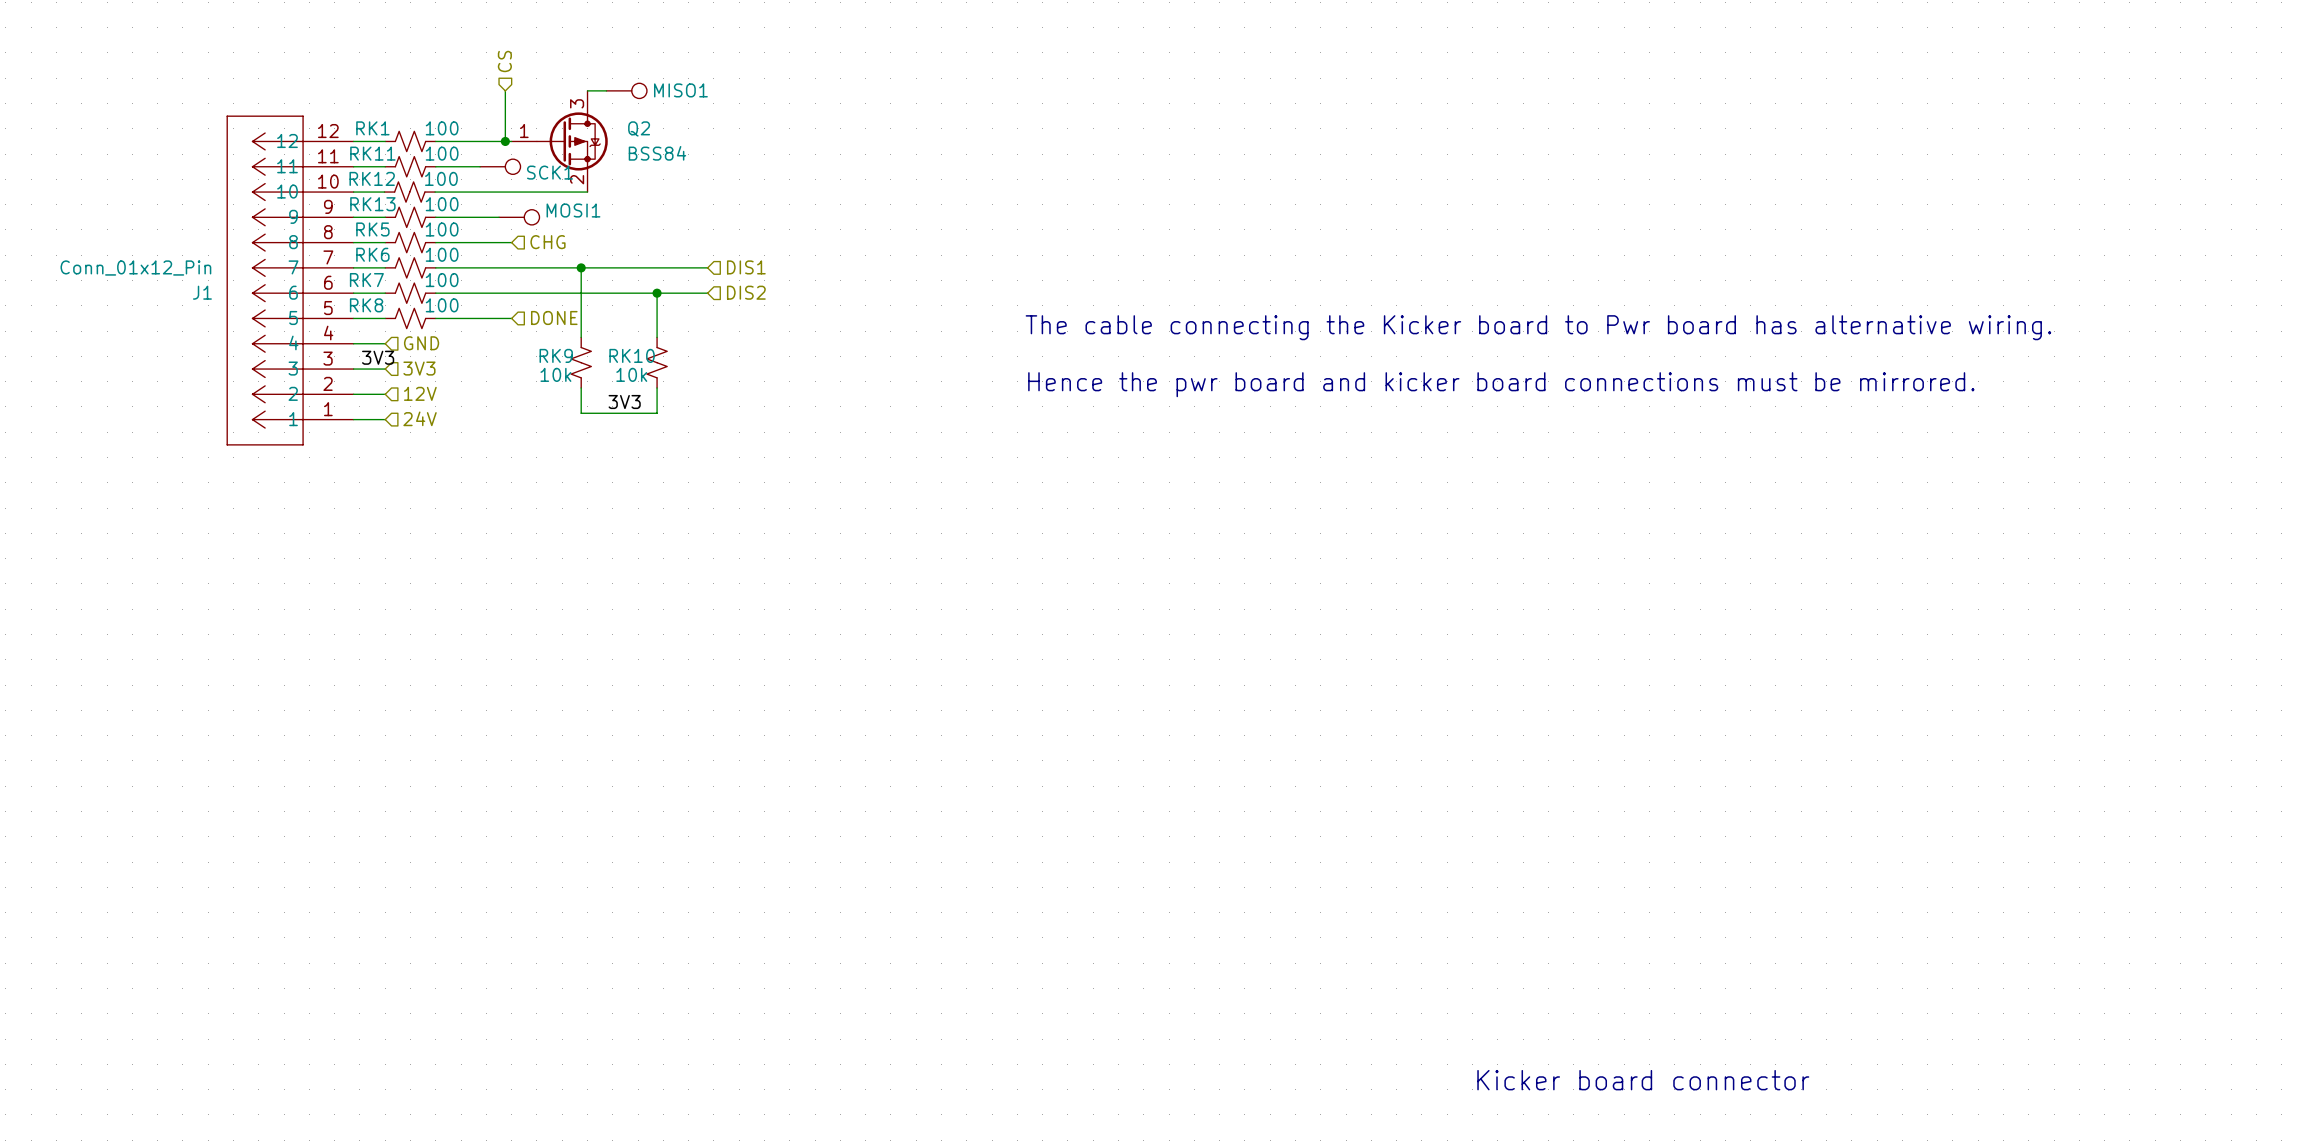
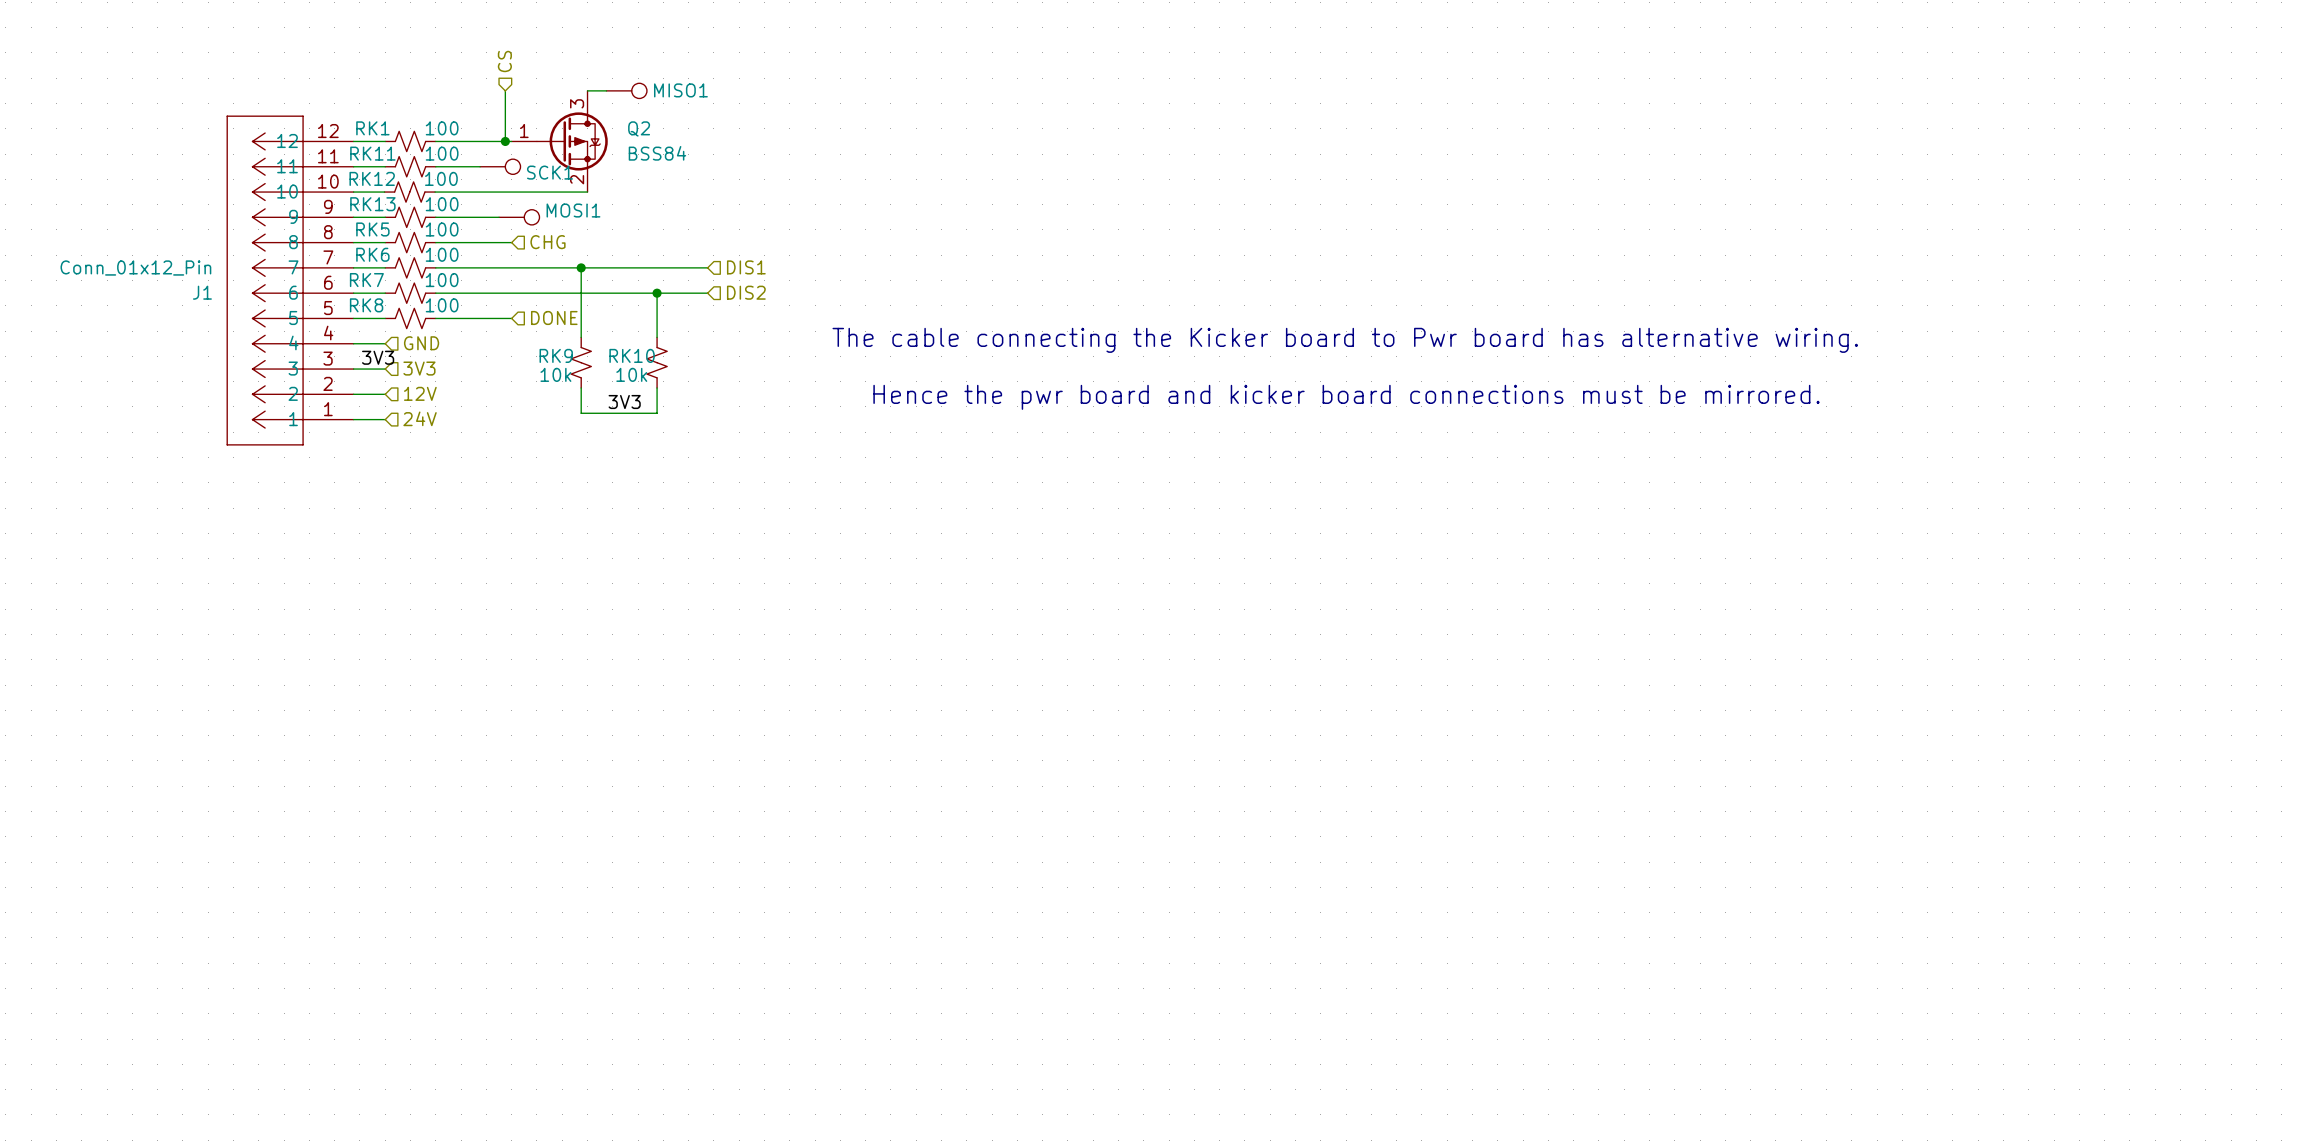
text: The cable connecting the Kicker board to Pwr board has alternative wiring. (1538, 327) -> none
text: none -> The cable connecting the Kicker board to Pwr board has alternative wiring. (1345, 340)
text: Hence the pwr board and kicker board connections must be mirrored. (1501, 384) -> none
text: none -> Hence the pwr board and kicker board connections must be mirrored. (1346, 397)
text: Kicker board connector (1643, 1080) -> none

